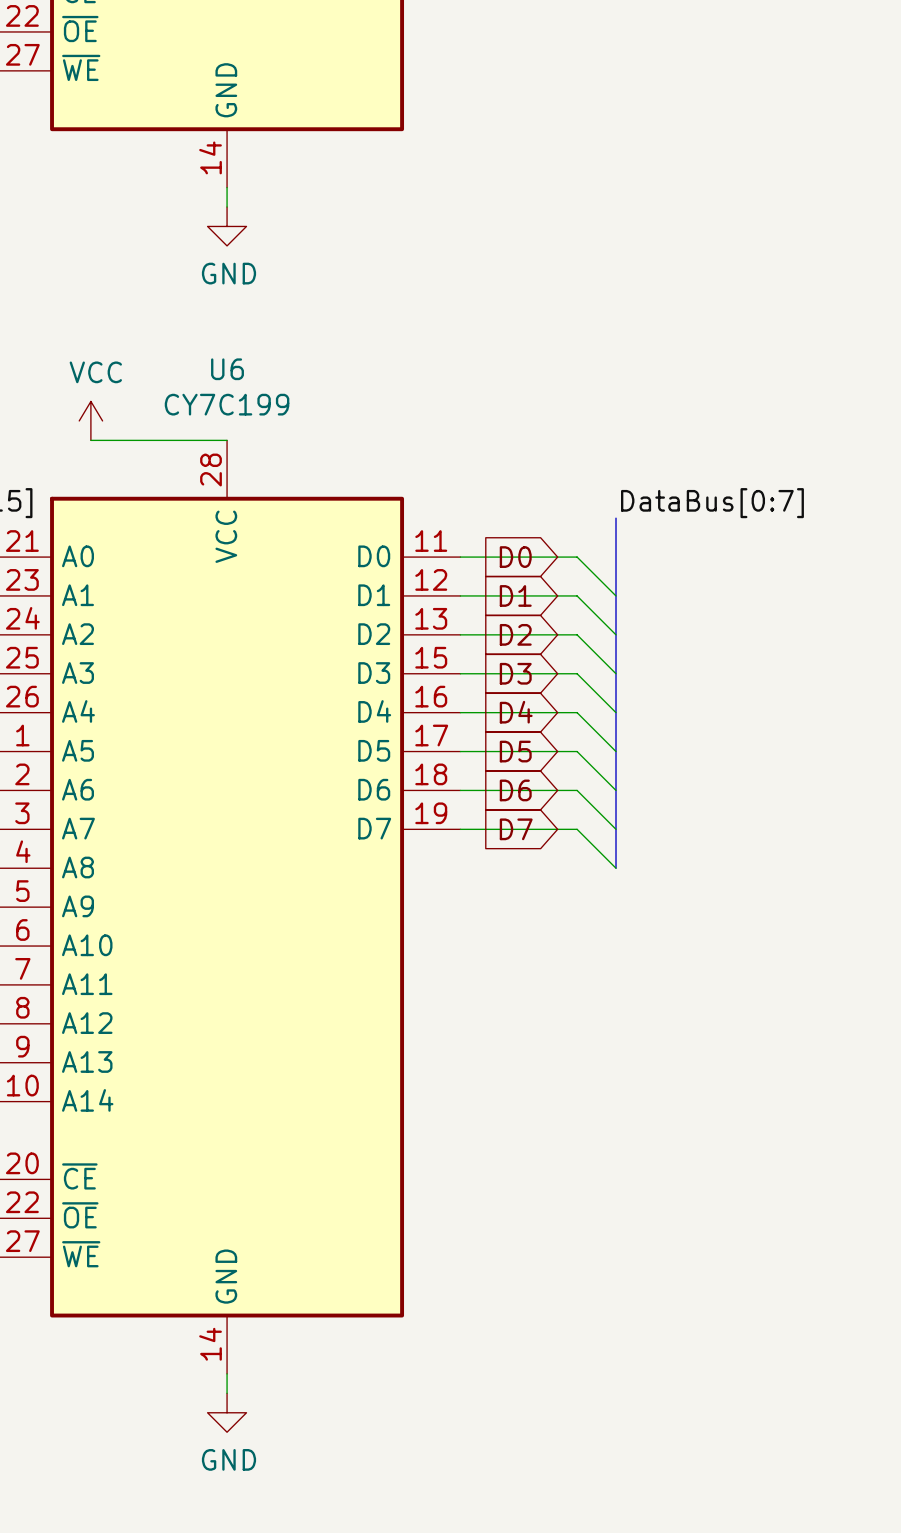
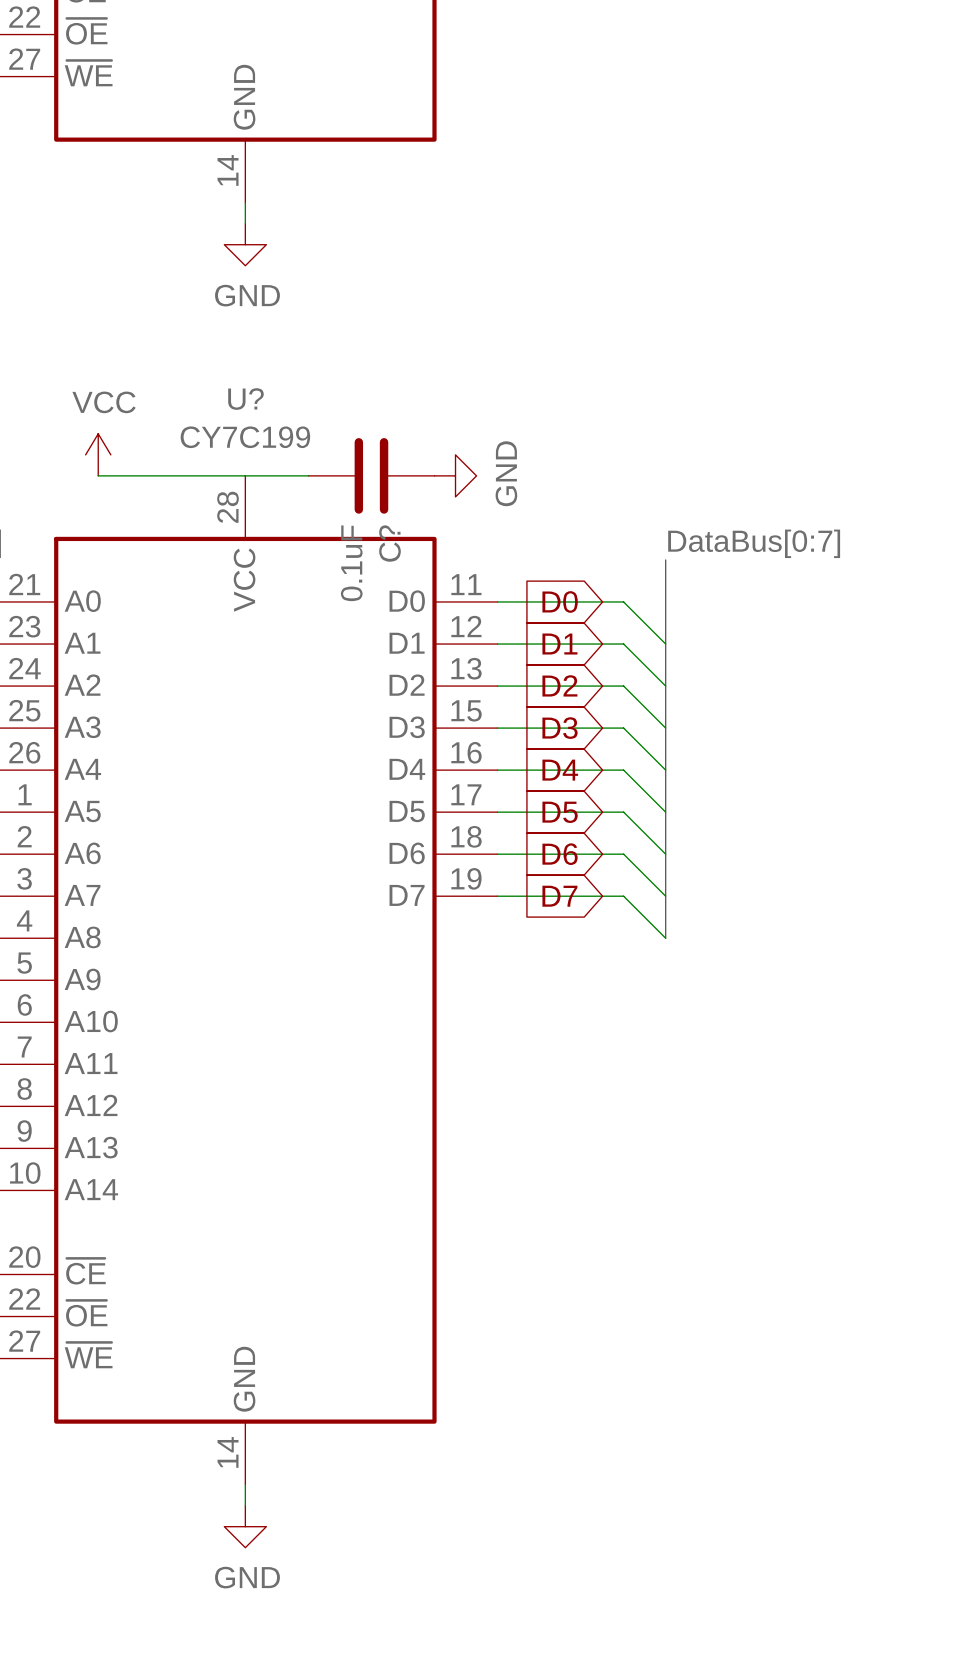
U6 name: U6 (227, 369) -> U? (245, 399)
wire: none -> (245, 475) (308, 475)
C?: none -> 0.1uF (371, 475)
power symbol: none -> GND (455, 475)

